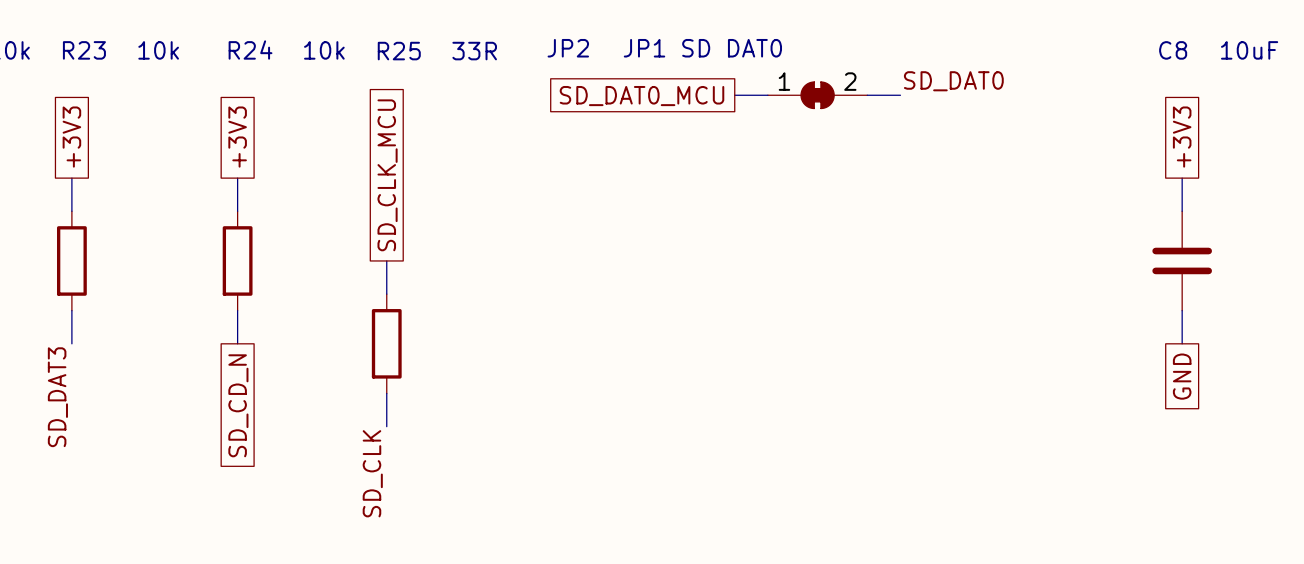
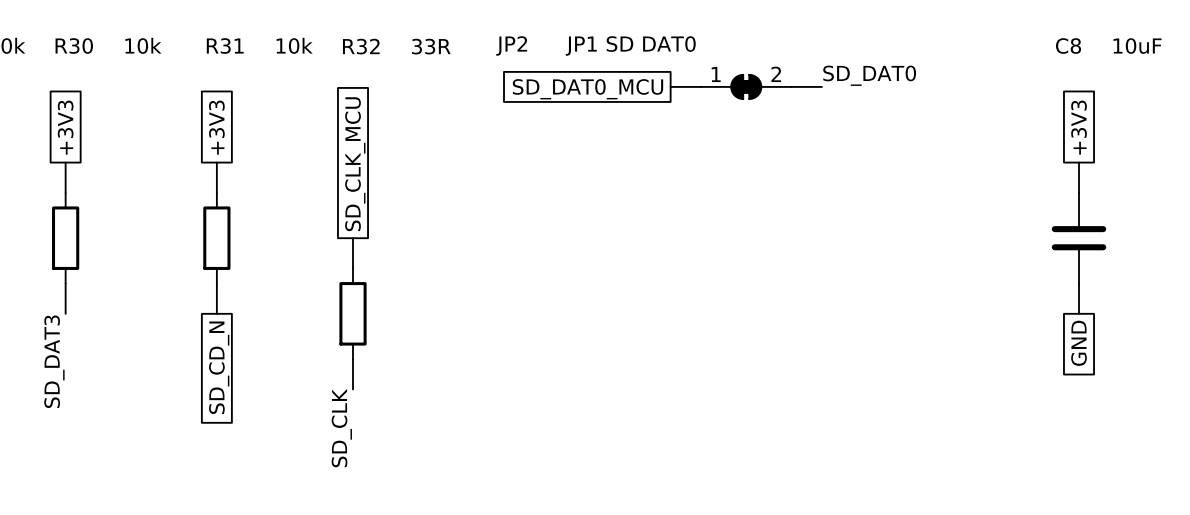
R23 name: R23 (84, 50) -> R30 (74, 46)
R24 name: R24 (250, 50) -> R31 (225, 46)
R25 name: R25 (399, 51) -> R32 (361, 46)

